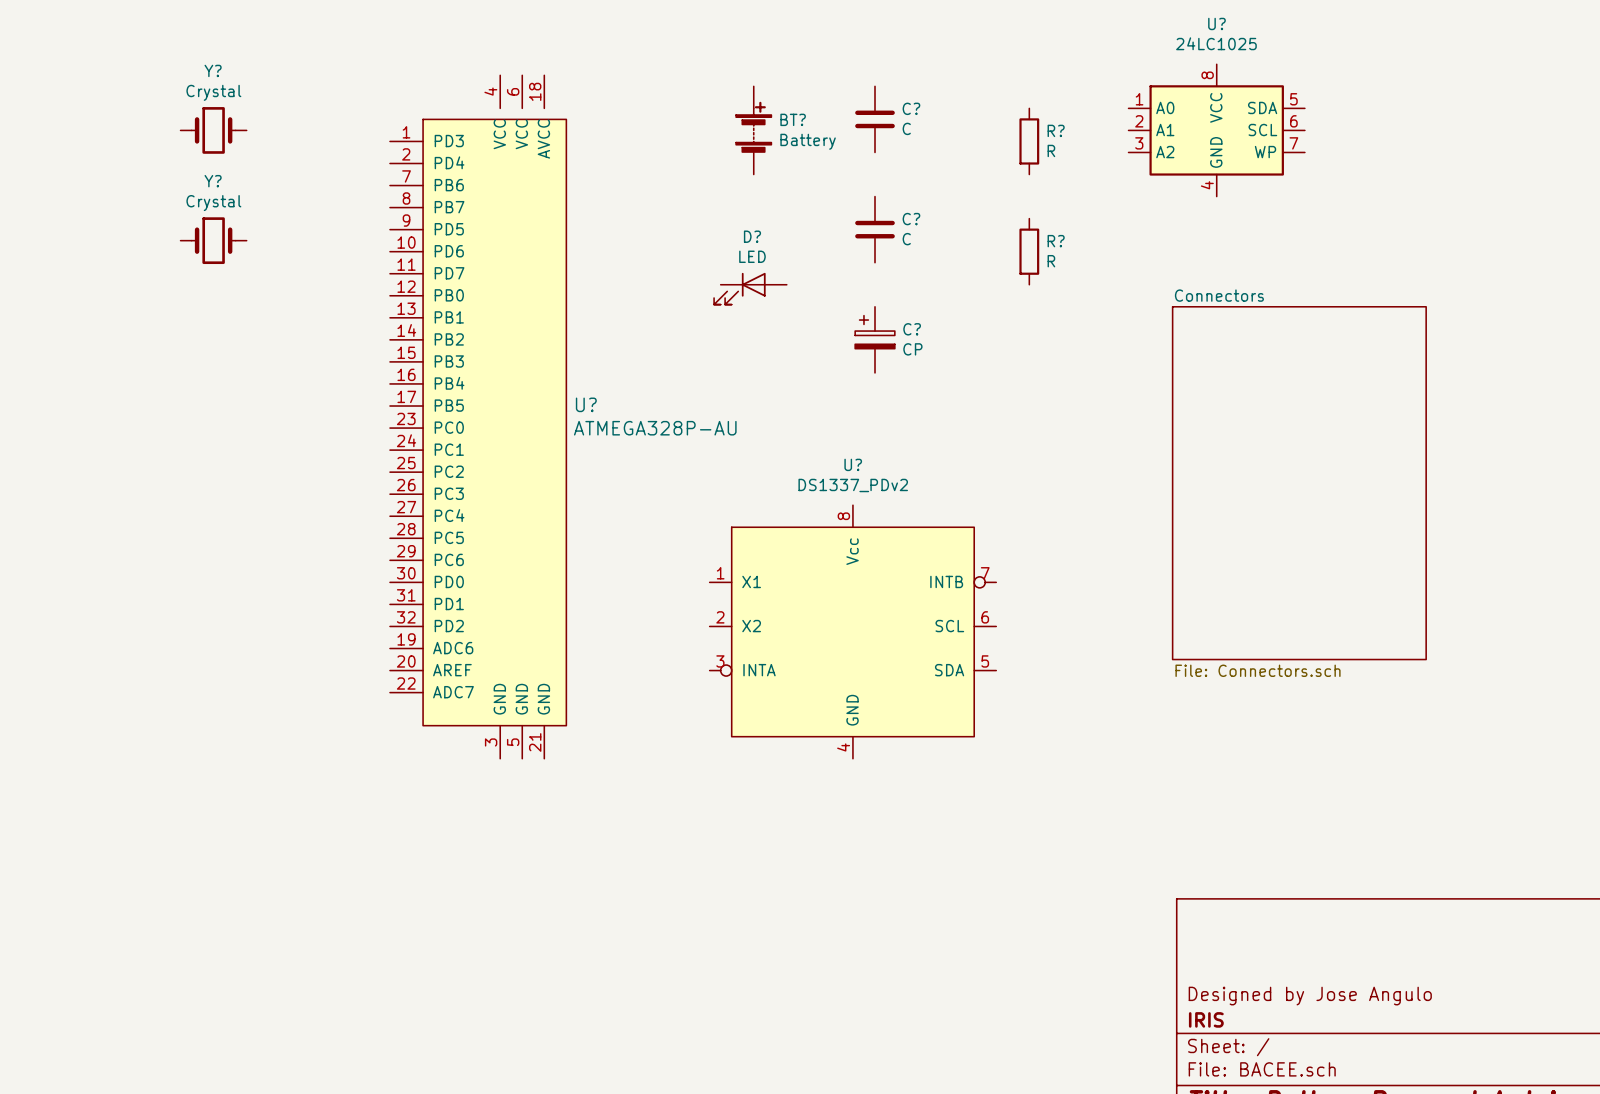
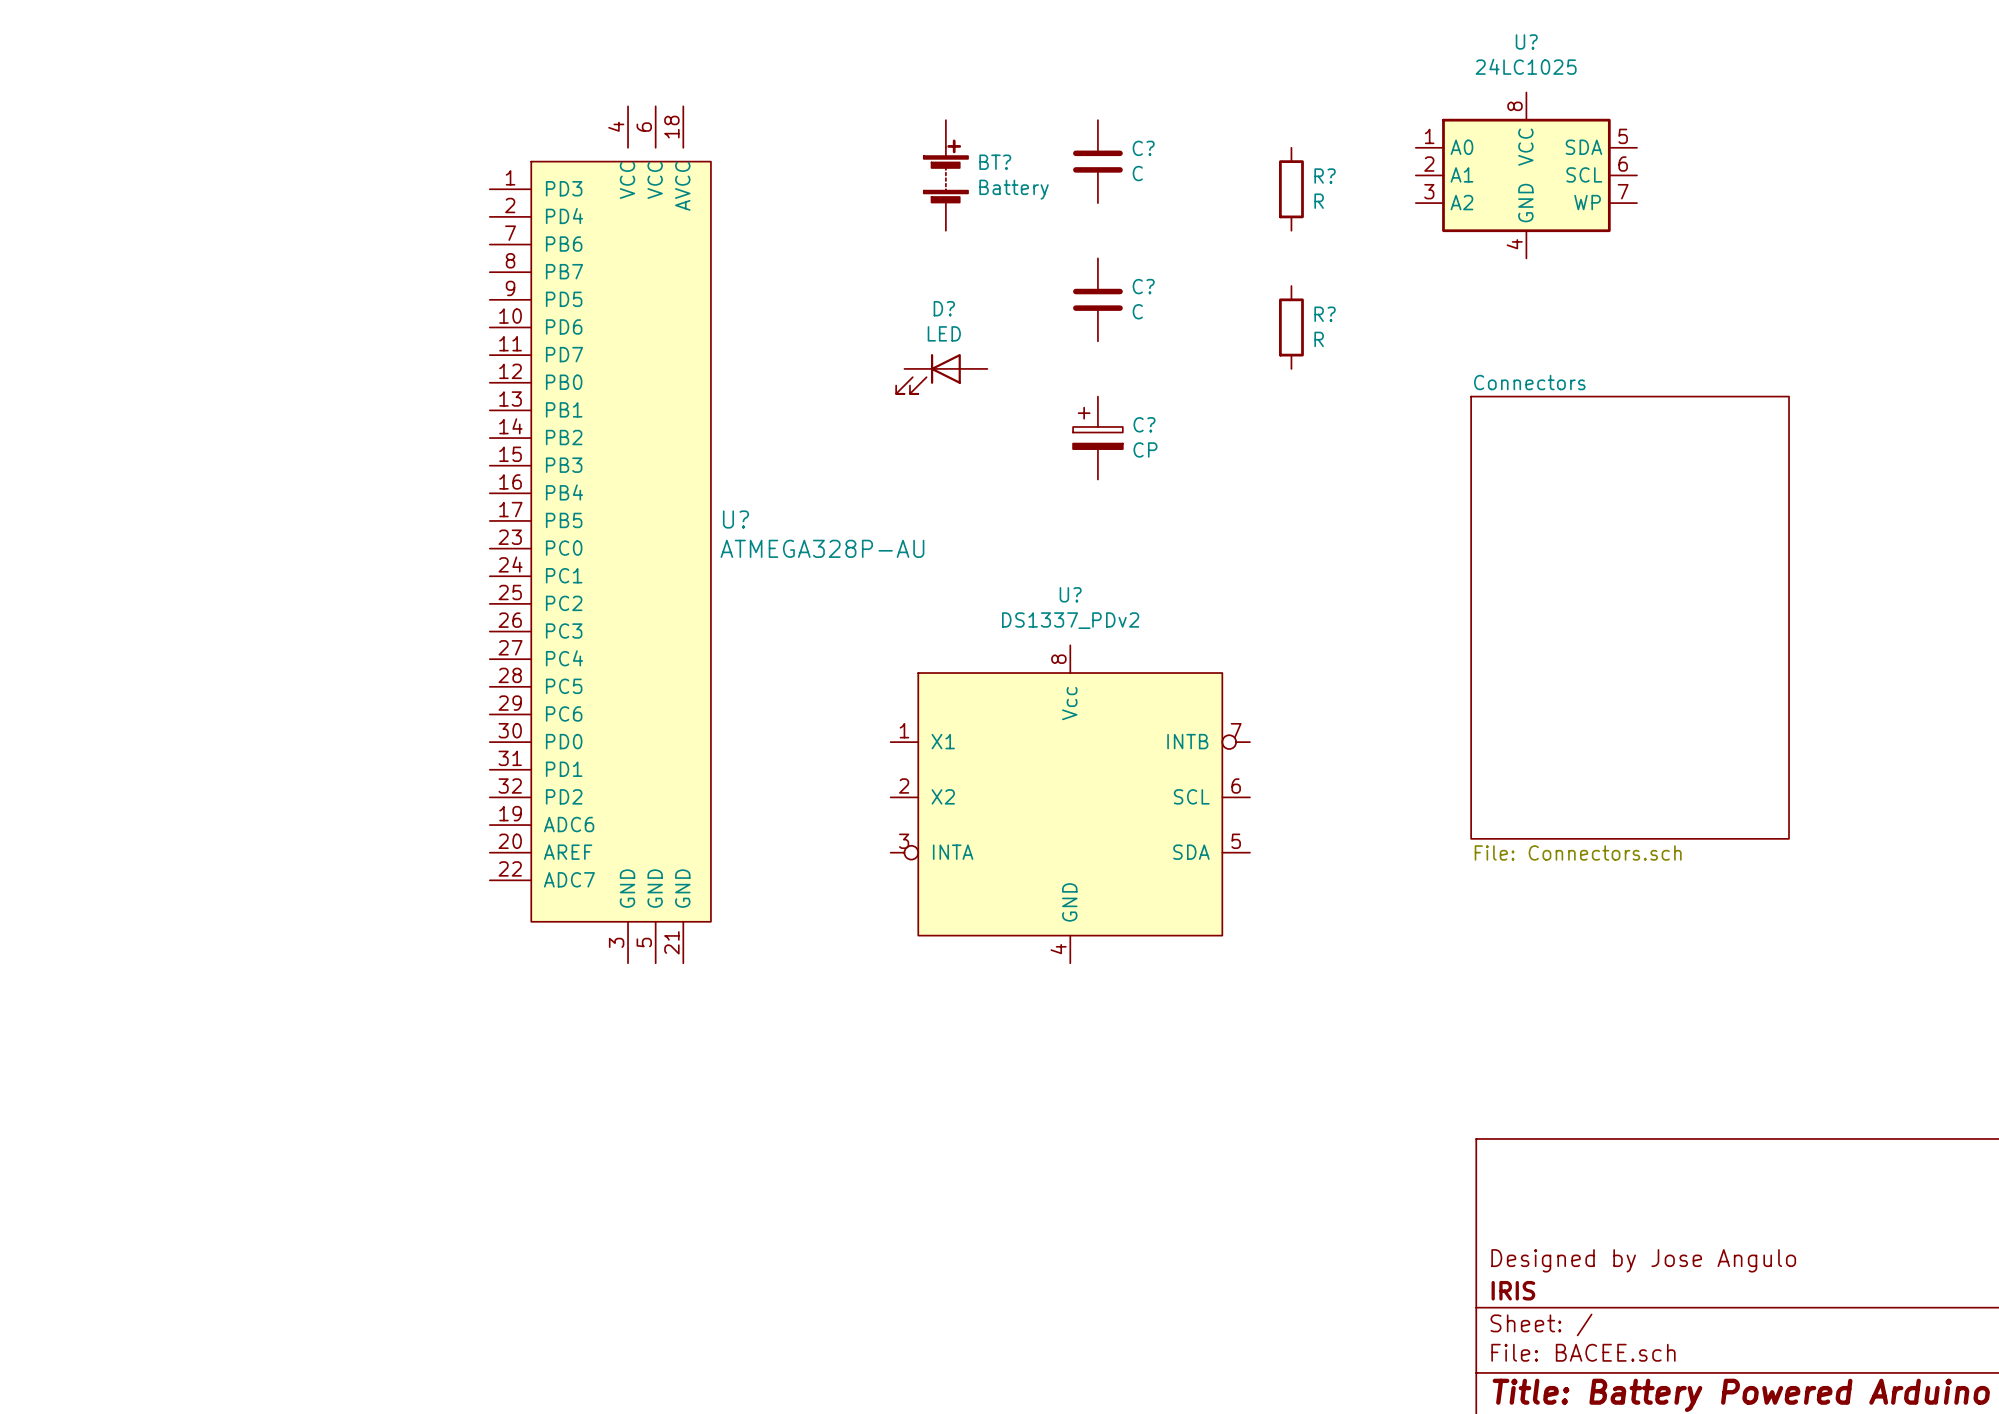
Y?: Crystal (213, 130) -> none
Y?: Crystal (213, 240) -> none

